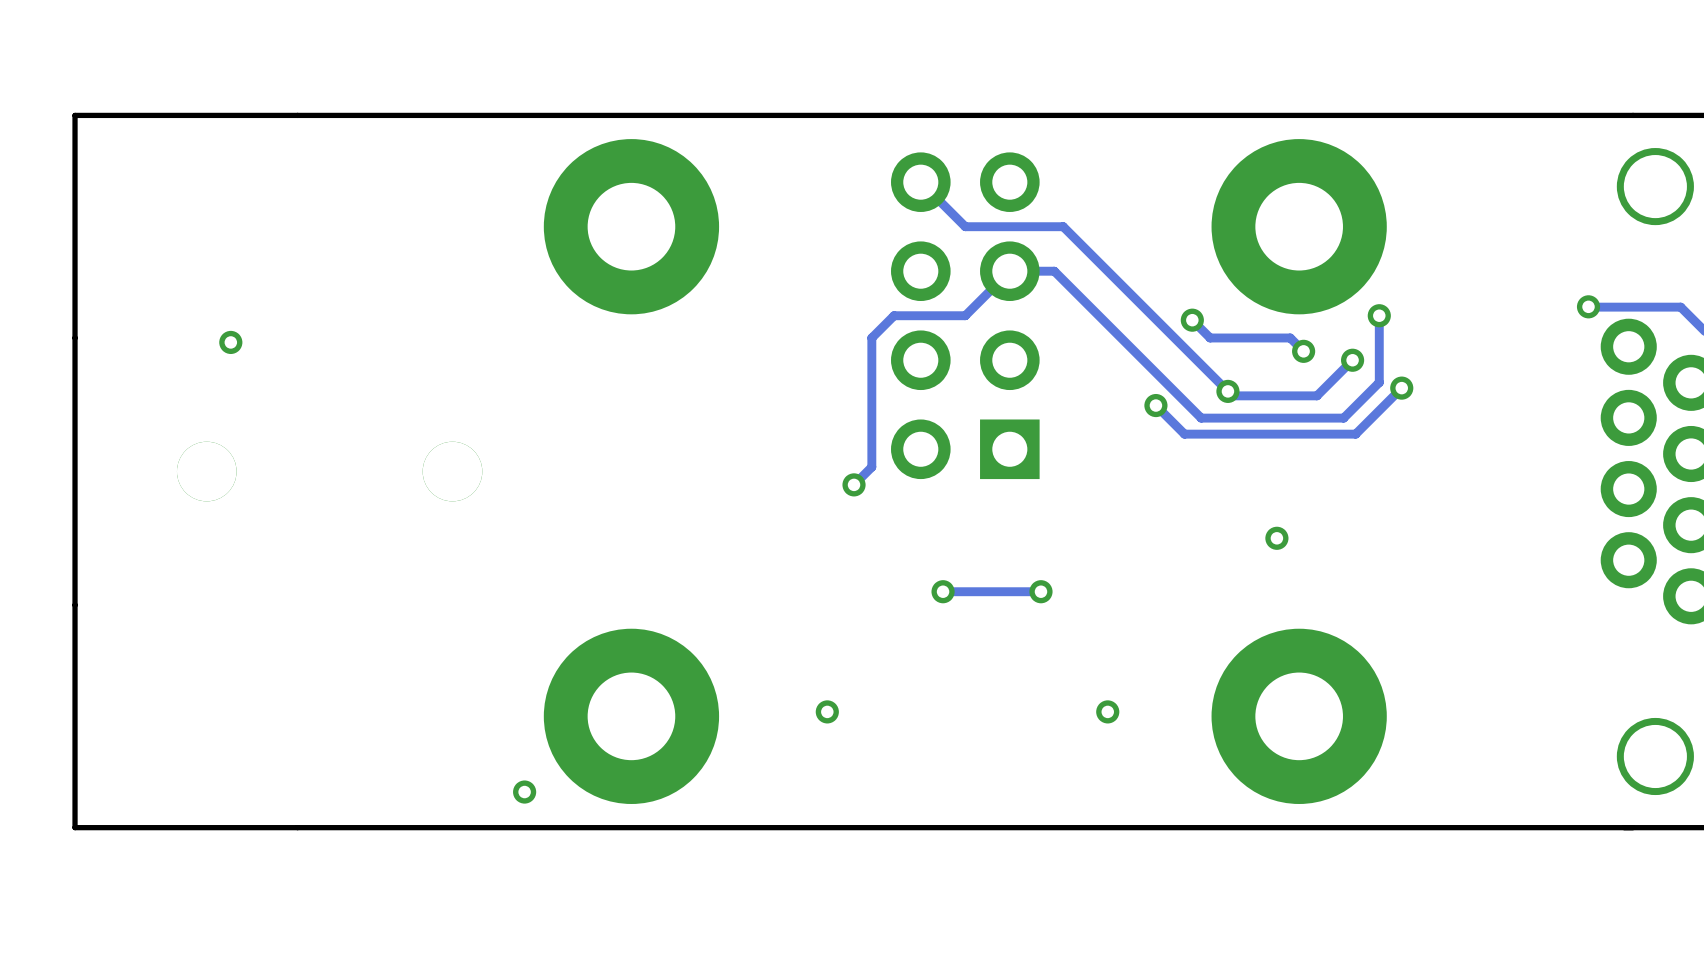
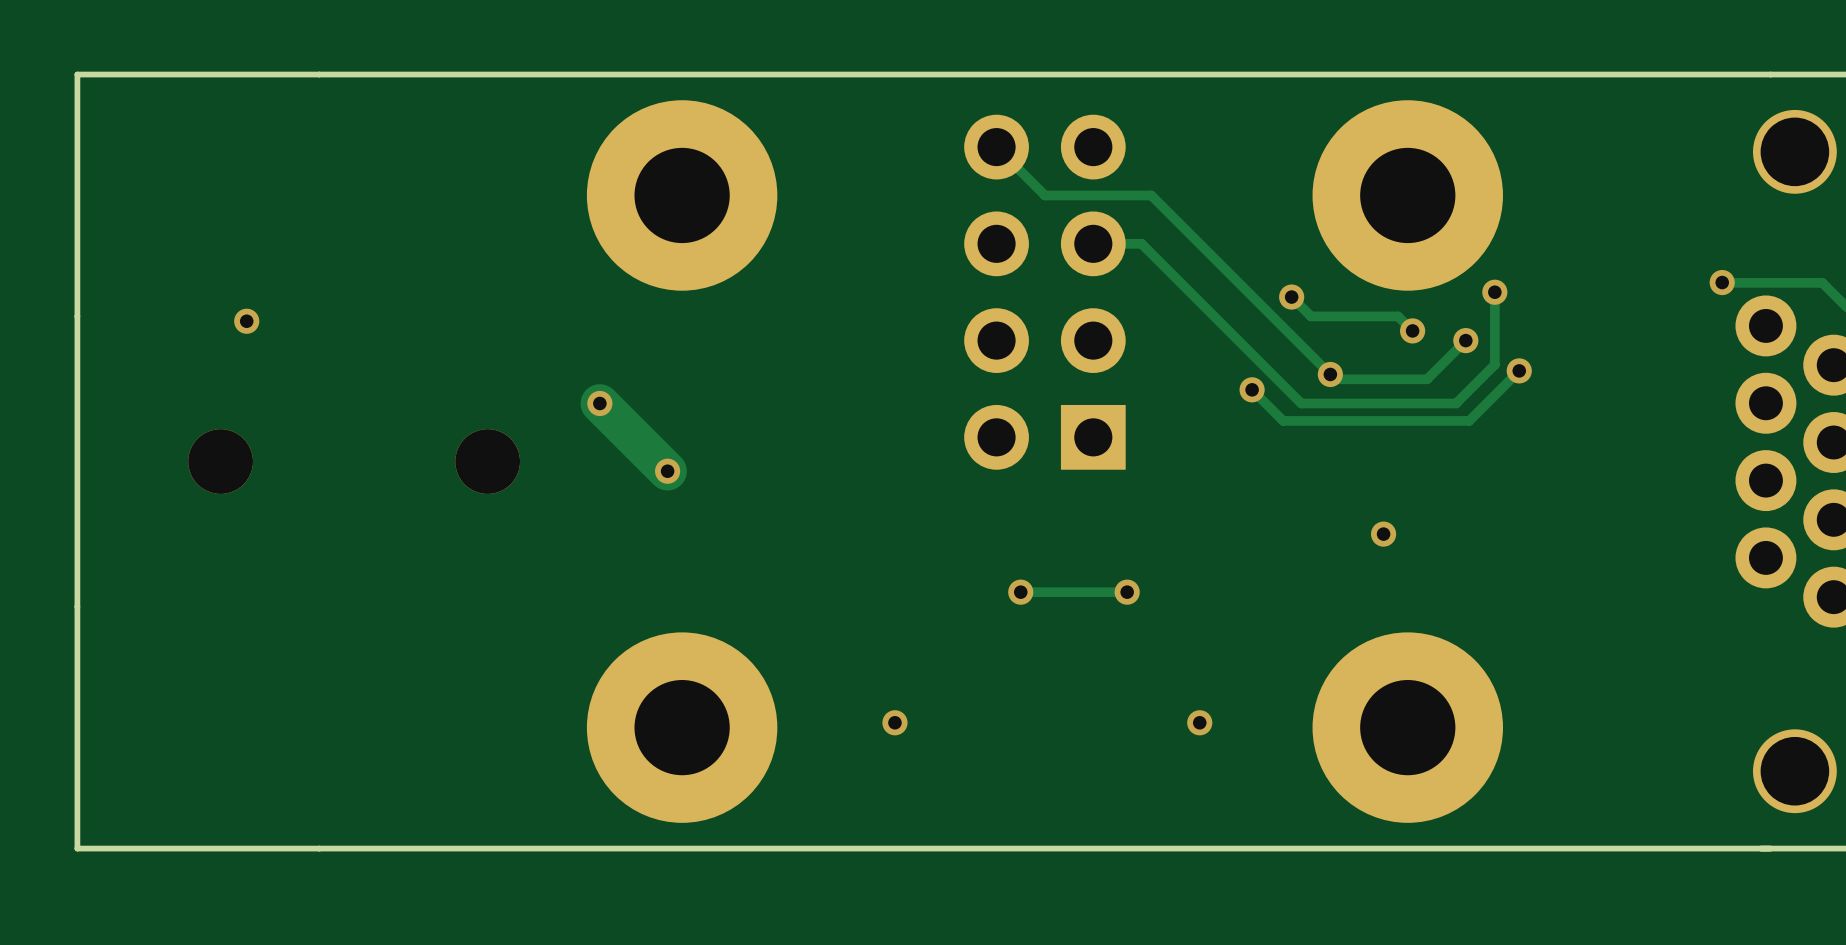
track: (1009, 271) (965, 315) (894, 315) (871, 337) (871, 467) (854, 484) -> none
track: none -> (599, 403) (667, 471)
via: none -> (599, 403)
via: none -> (667, 471)
via: (854, 484) -> none
via: (524, 792) -> none

